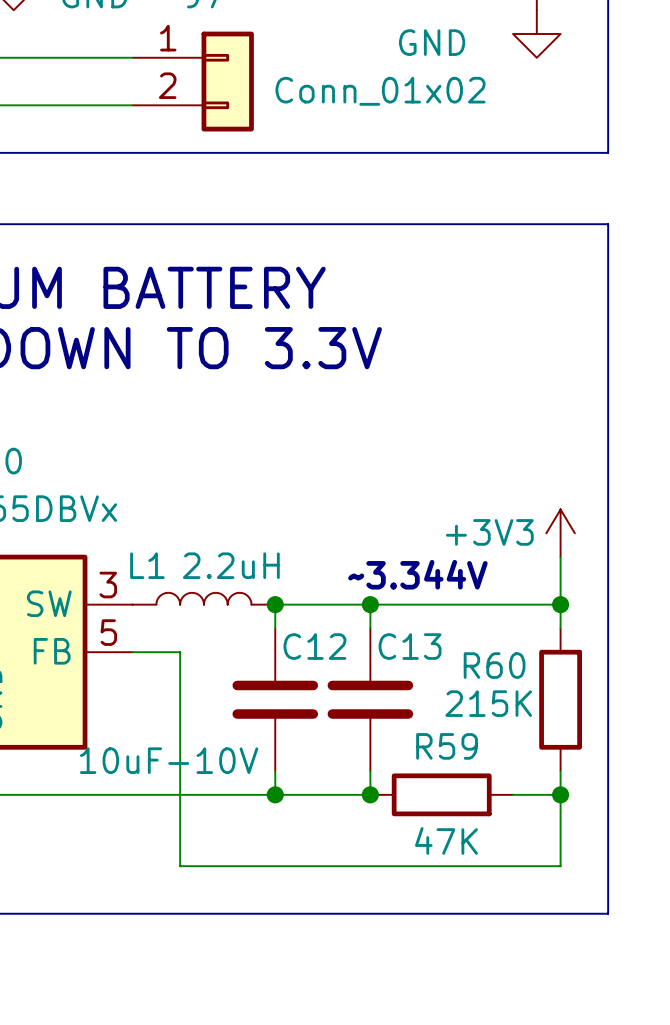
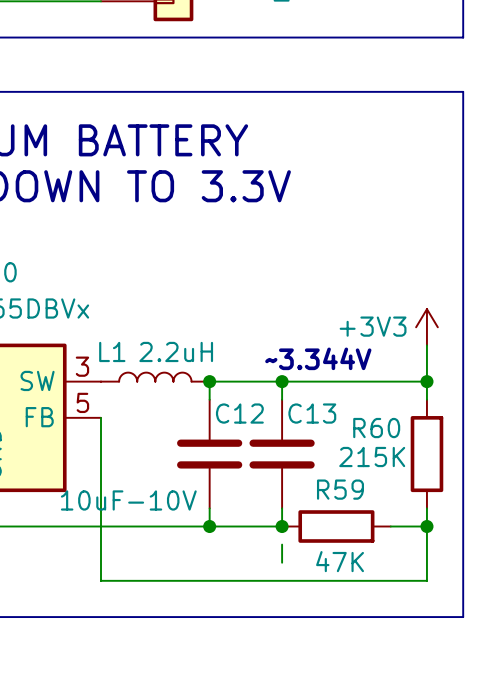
wire: (132, 652) (180, 652) (180, 866) -> (101, 417) (101, 580) (137, 580)
wire: none -> (282, 544) (282, 562)

